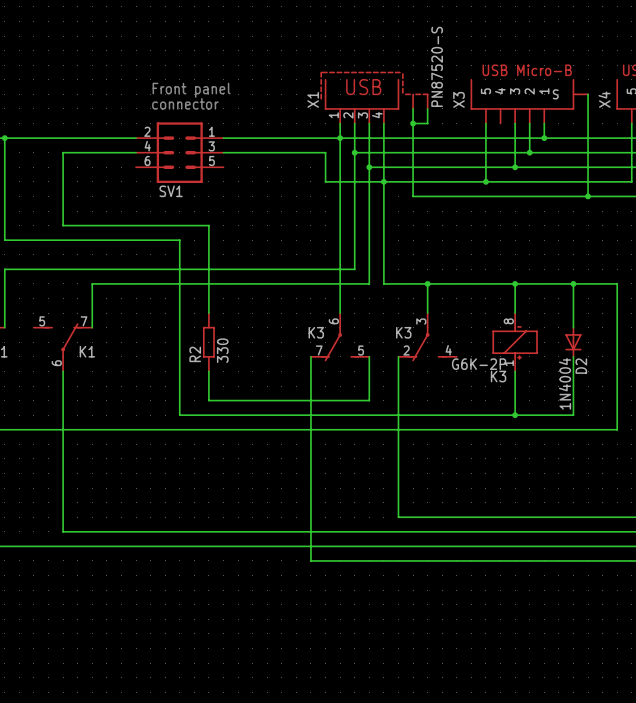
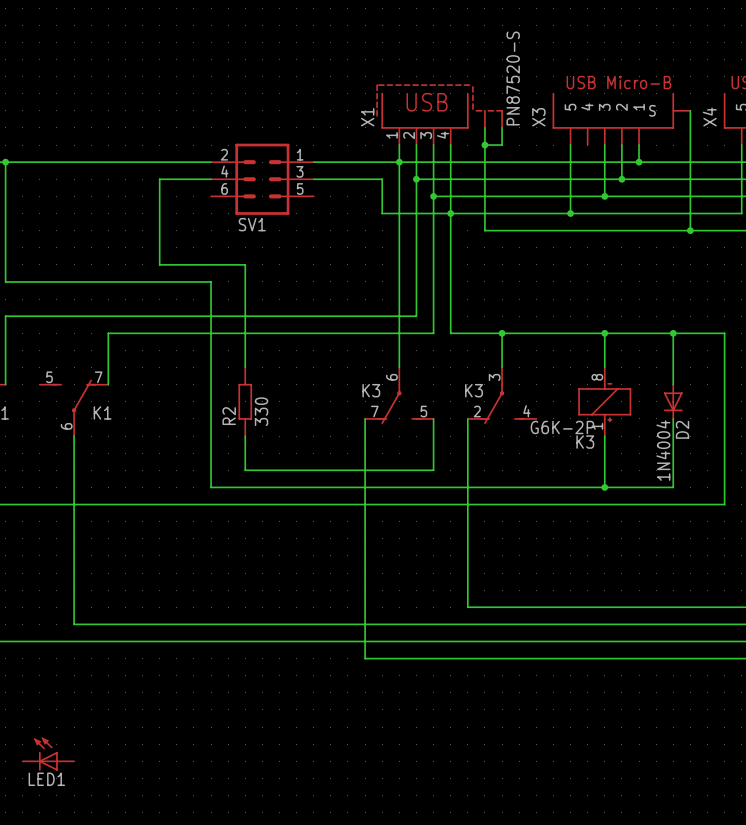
text: Front panel (191, 90) -> none
text: connector (185, 103) -> none
wire: (136, 152) (63, 152) (63, 225) (136, 225) -> (211, 179) (159, 179) (159, 264)
SV1 position: (179, 152) -> (262, 179)
LED1: none -> (48, 754)

